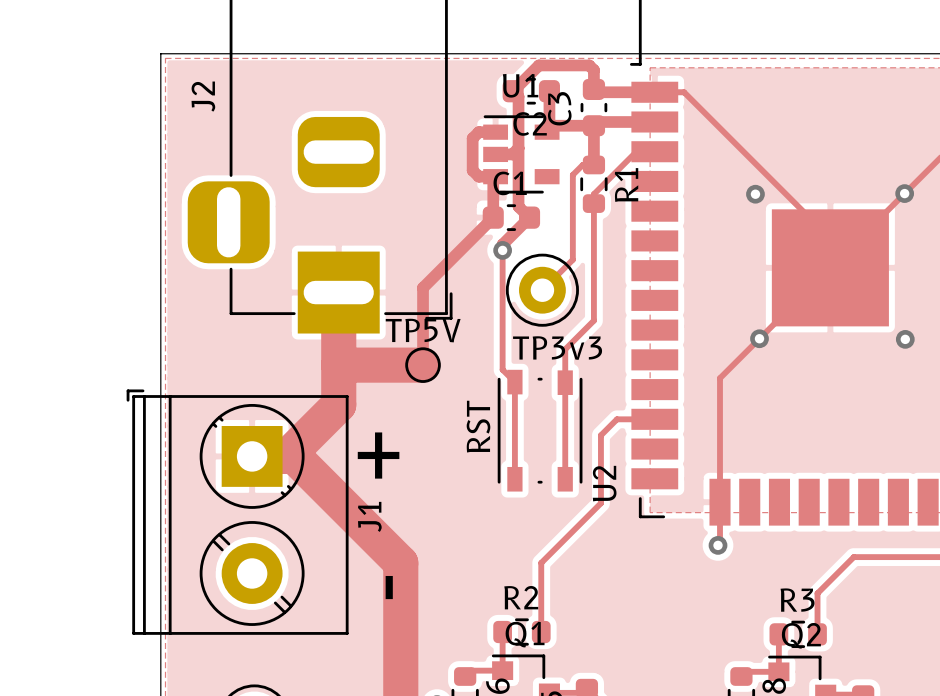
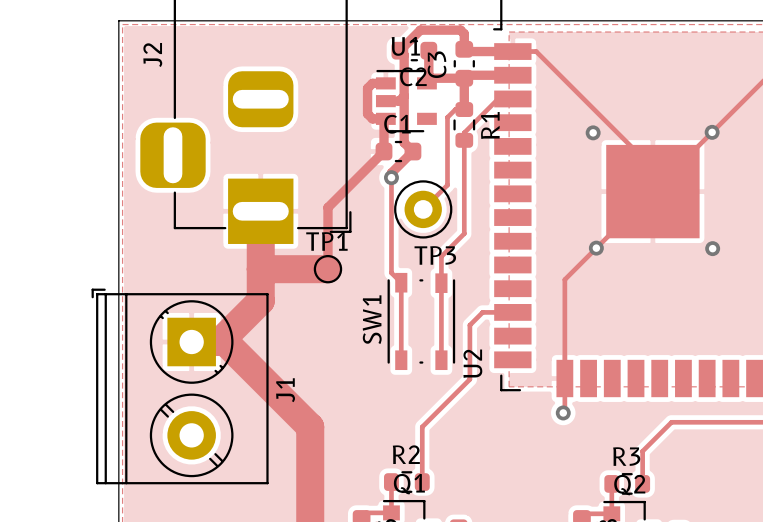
TP5V name: TP5V (423, 330) -> TP1 (326, 241)
TP3v3 name: TP3v3 (557, 348) -> TP3 (435, 255)
RST name: RST (478, 426) -> SW1 (372, 319)
text: + (378, 455) -> none
text: - (389, 587) -> none

